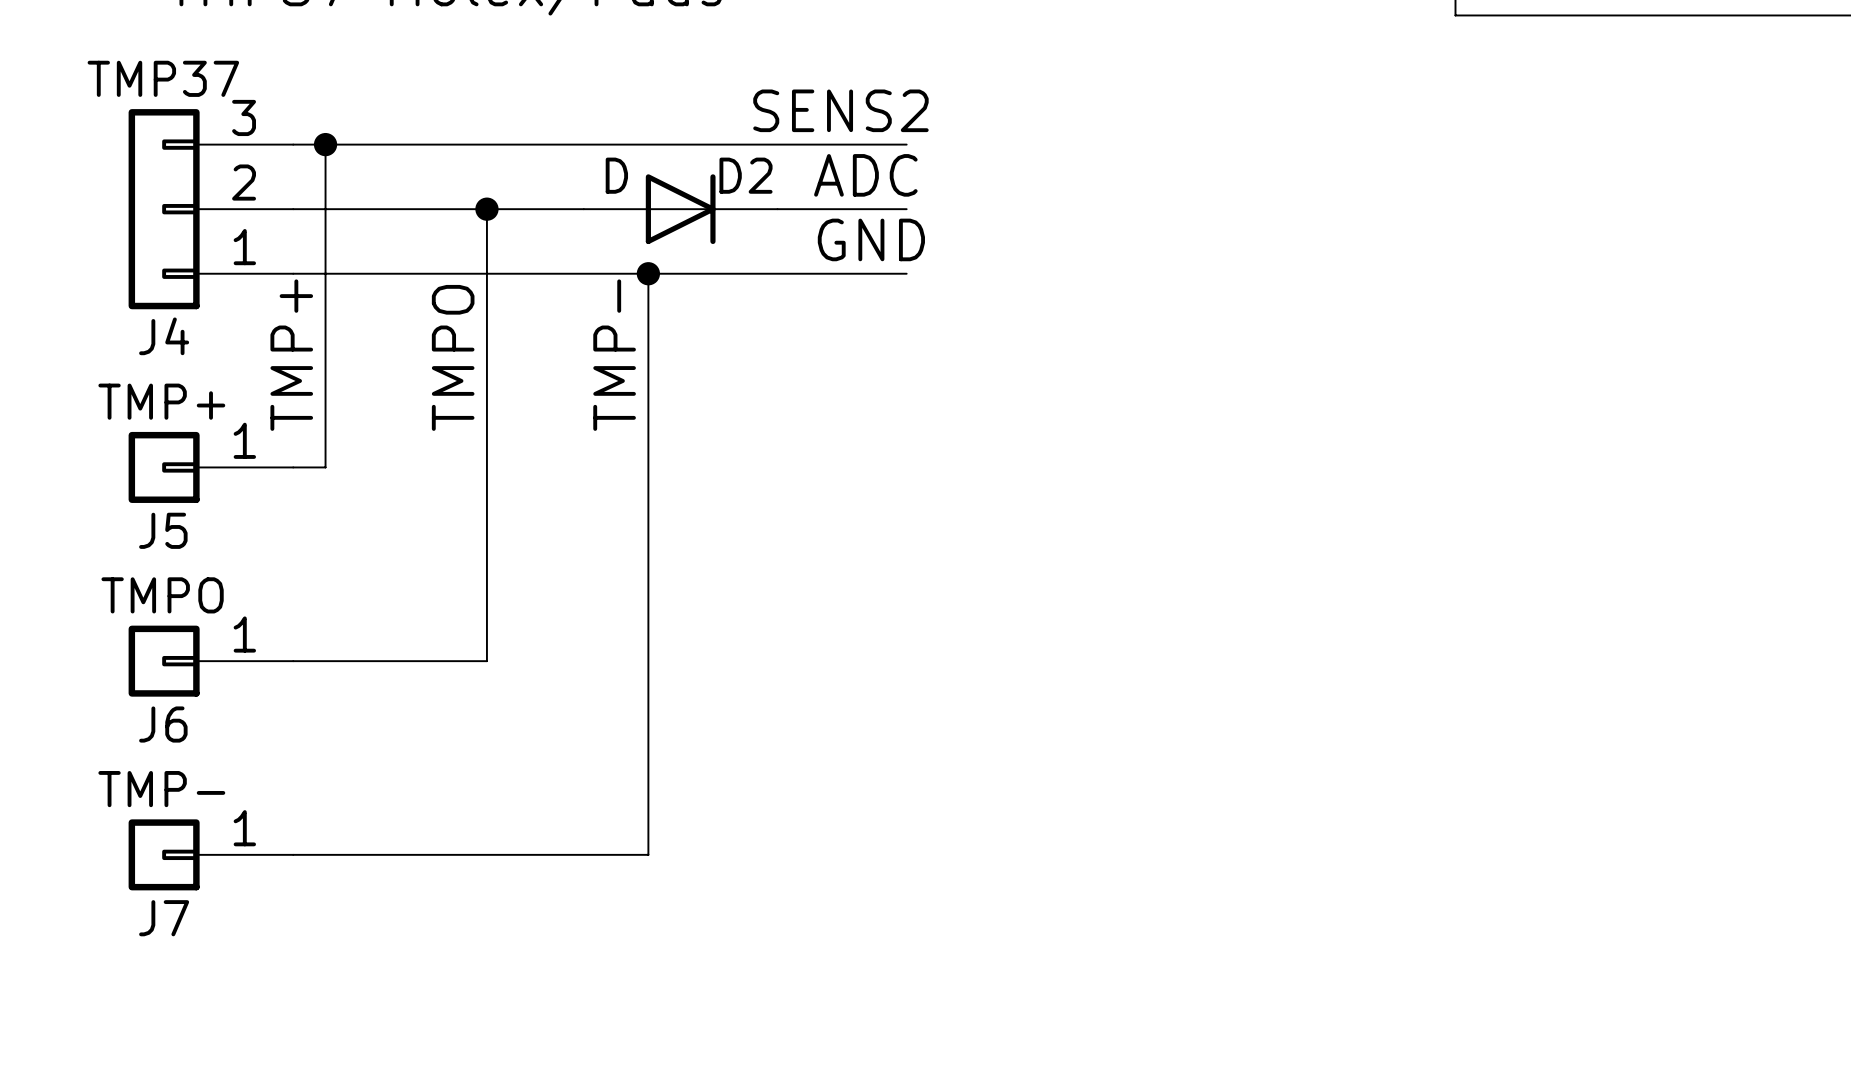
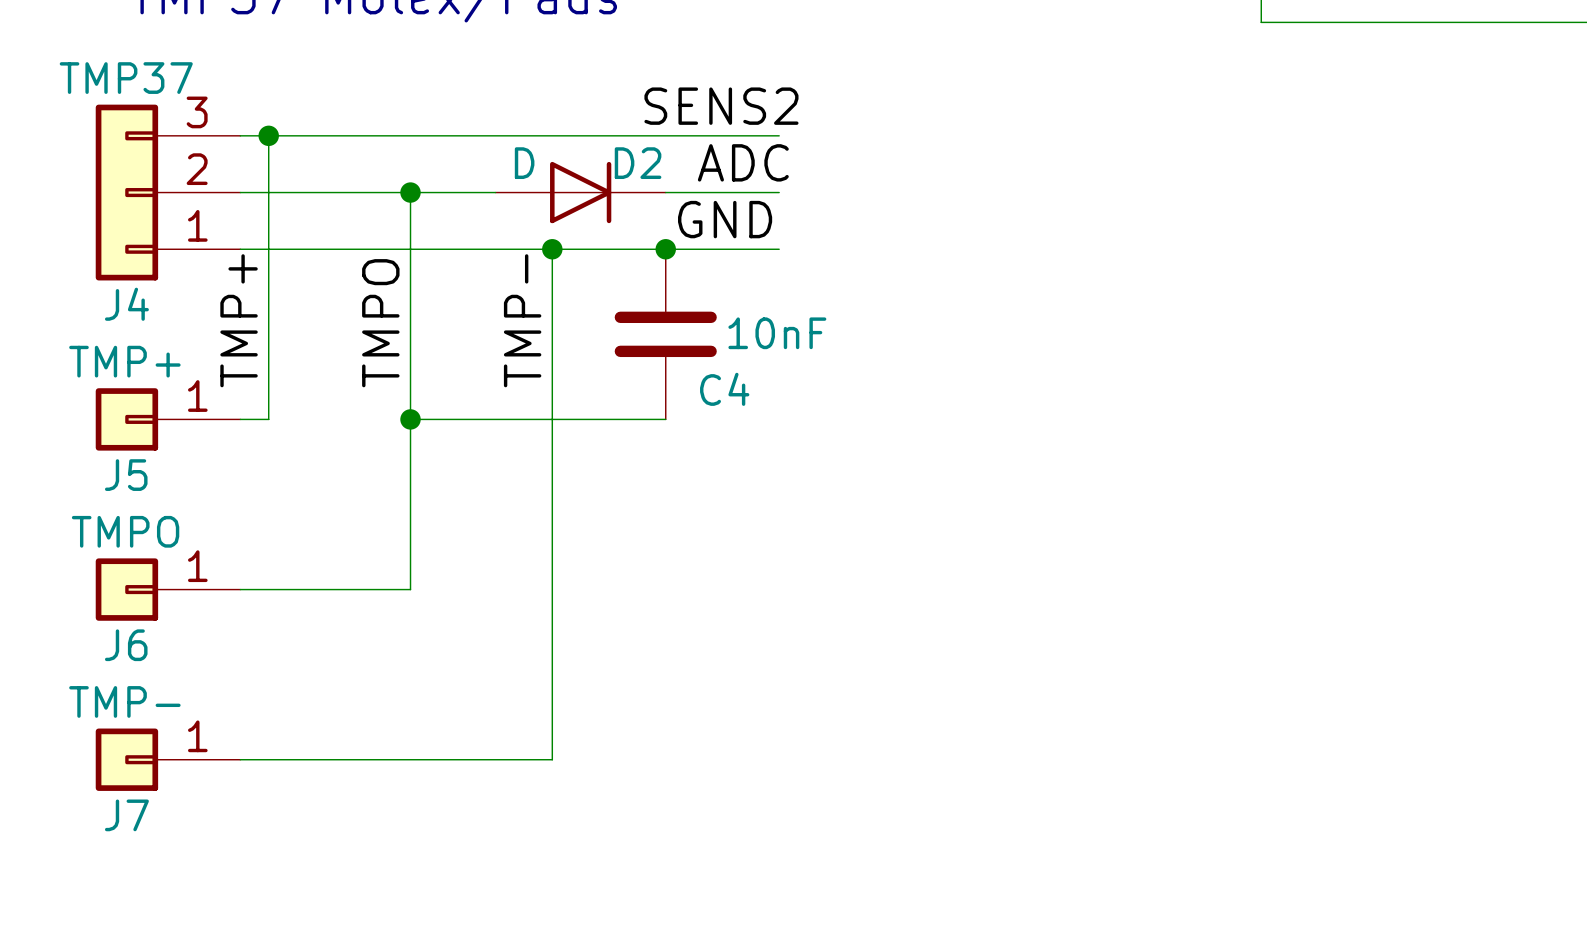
label position: GND (871, 239) -> GND (725, 219)
junction: none -> (665, 249)
C4: none -> 10nF (665, 334)
wire: none -> (410, 419) (665, 419)
junction: none -> (410, 419)

